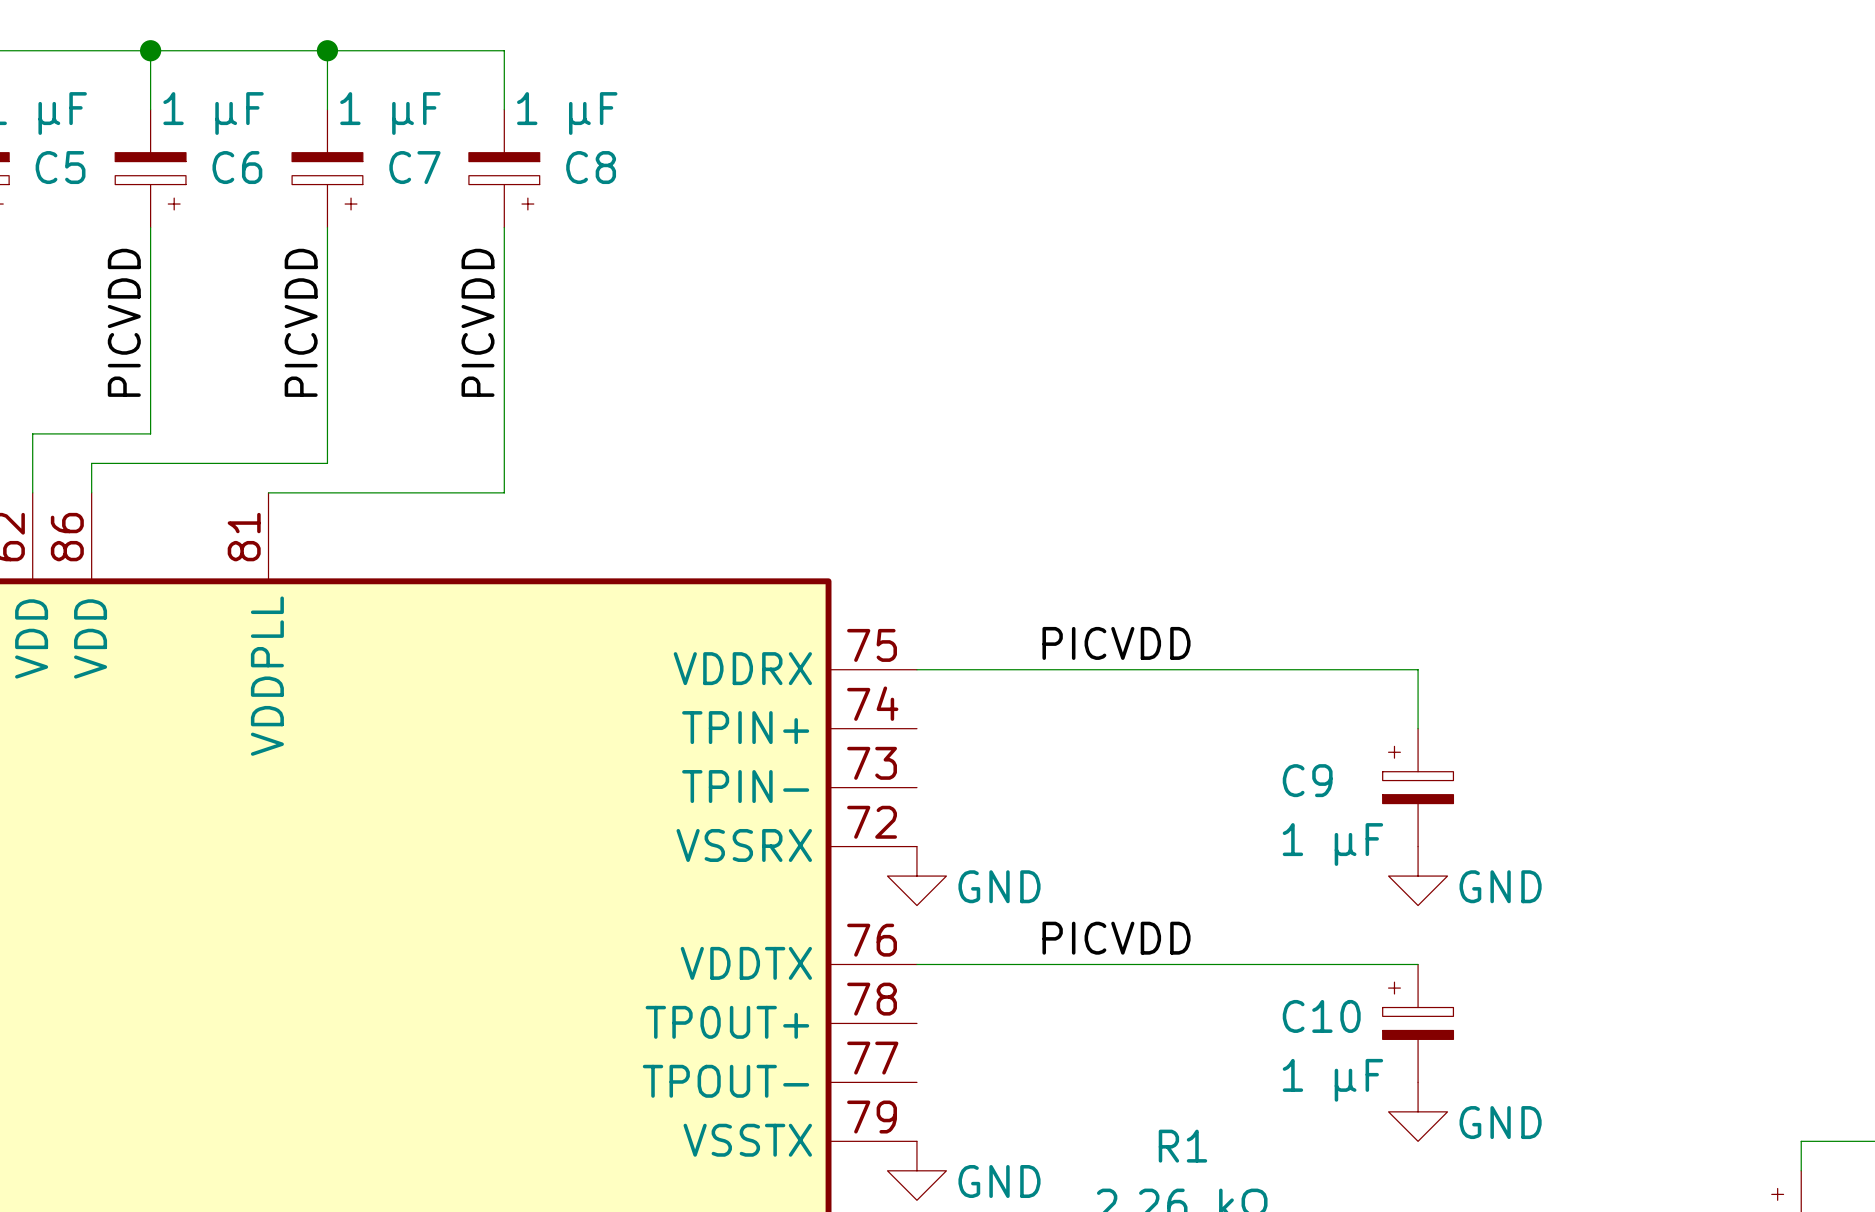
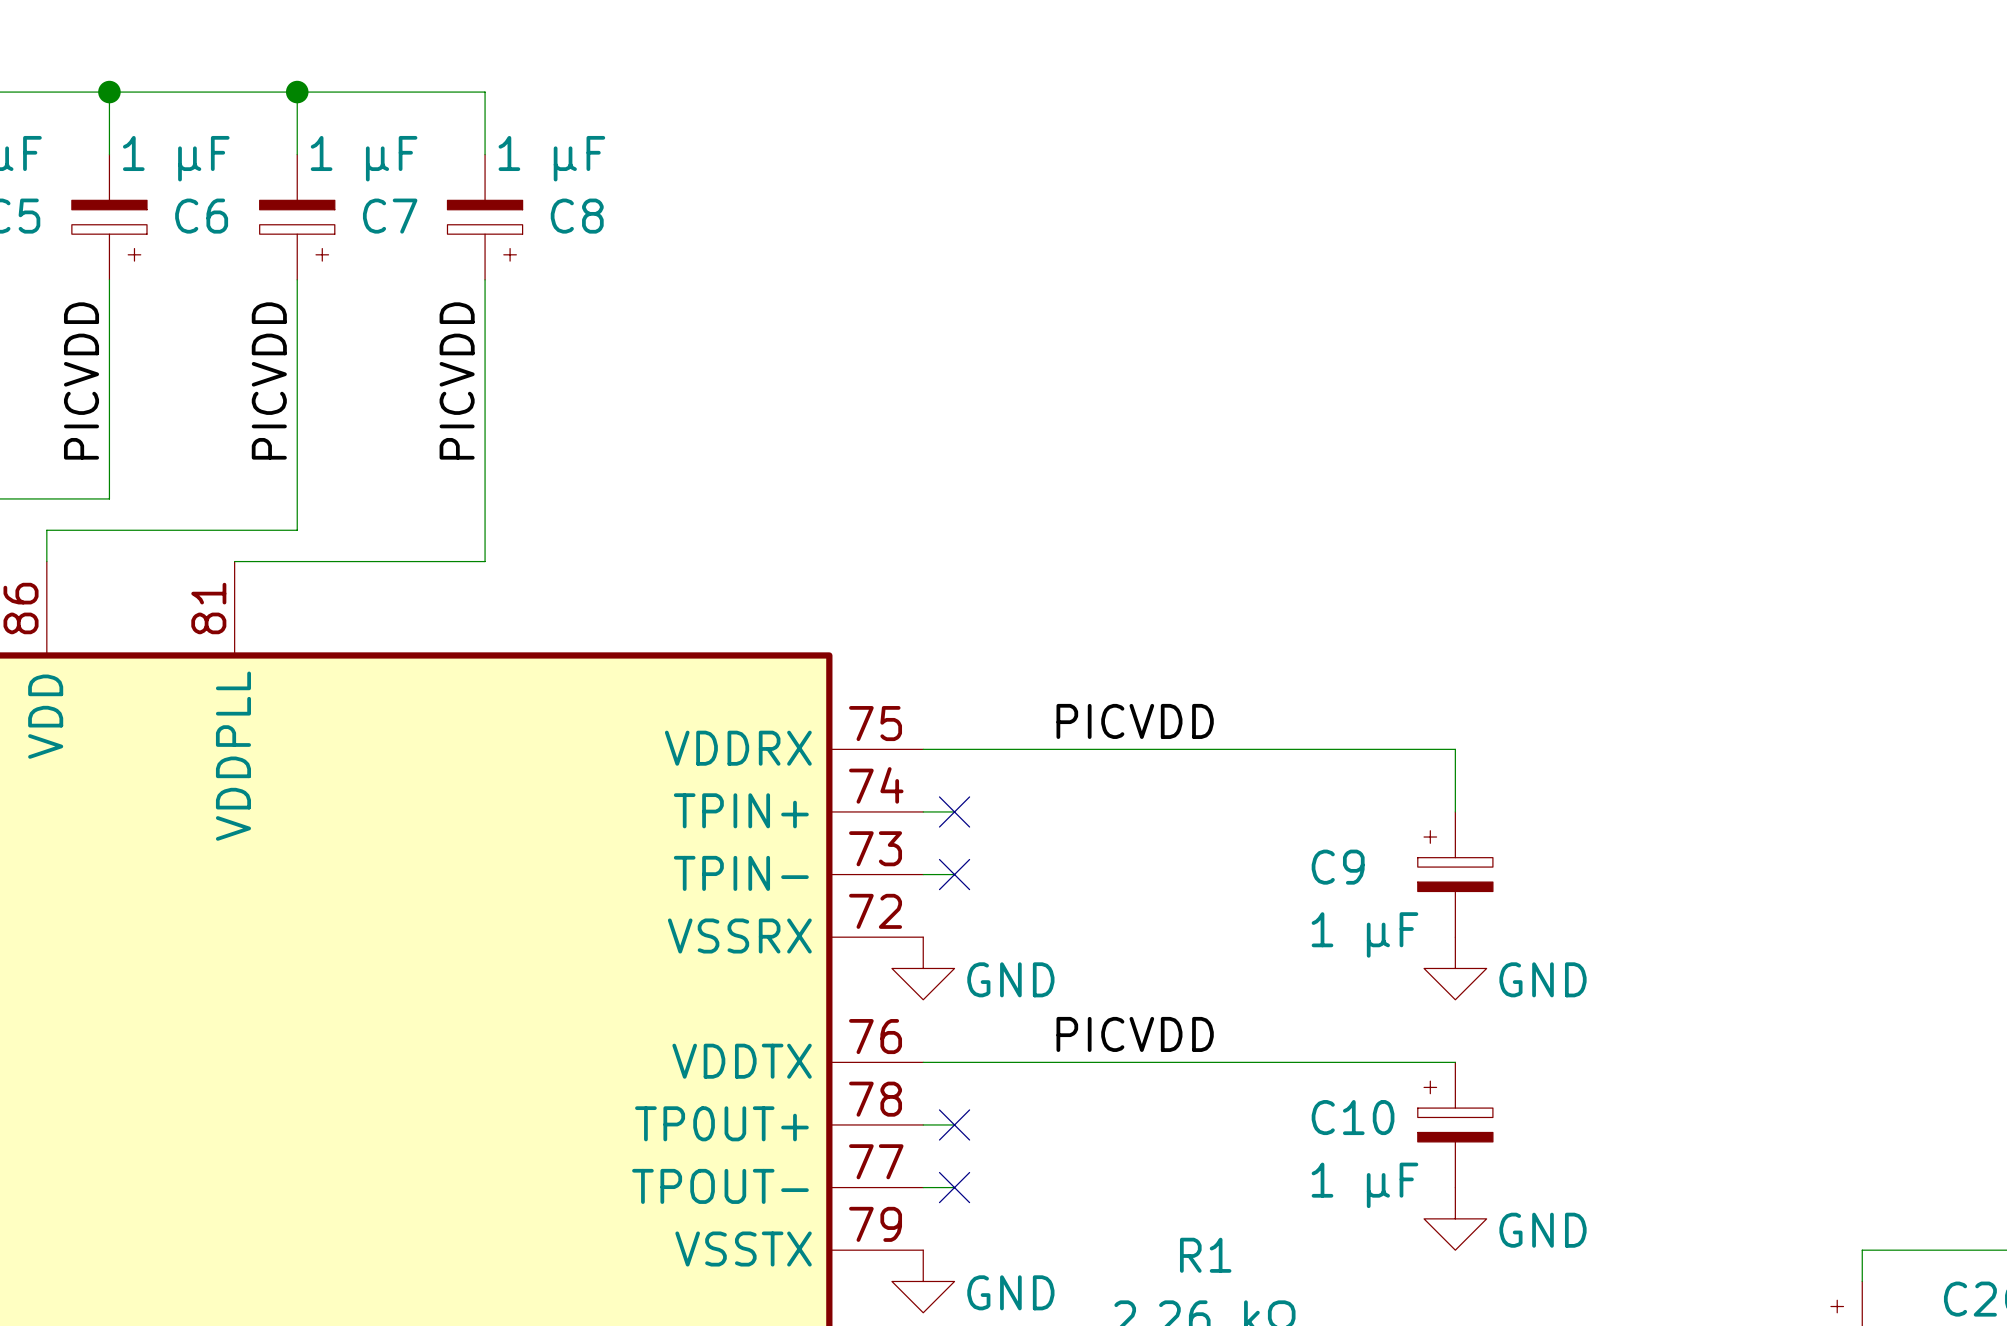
wire: none -> (923, 811) (954, 811)
no-connect mark: none -> (954, 811)
wire: none -> (923, 874) (954, 874)
no-connect mark: none -> (954, 874)
wire: none -> (923, 1124) (954, 1124)
no-connect mark: none -> (954, 1124)
wire: none -> (923, 1187) (954, 1187)
no-connect mark: none -> (954, 1187)

